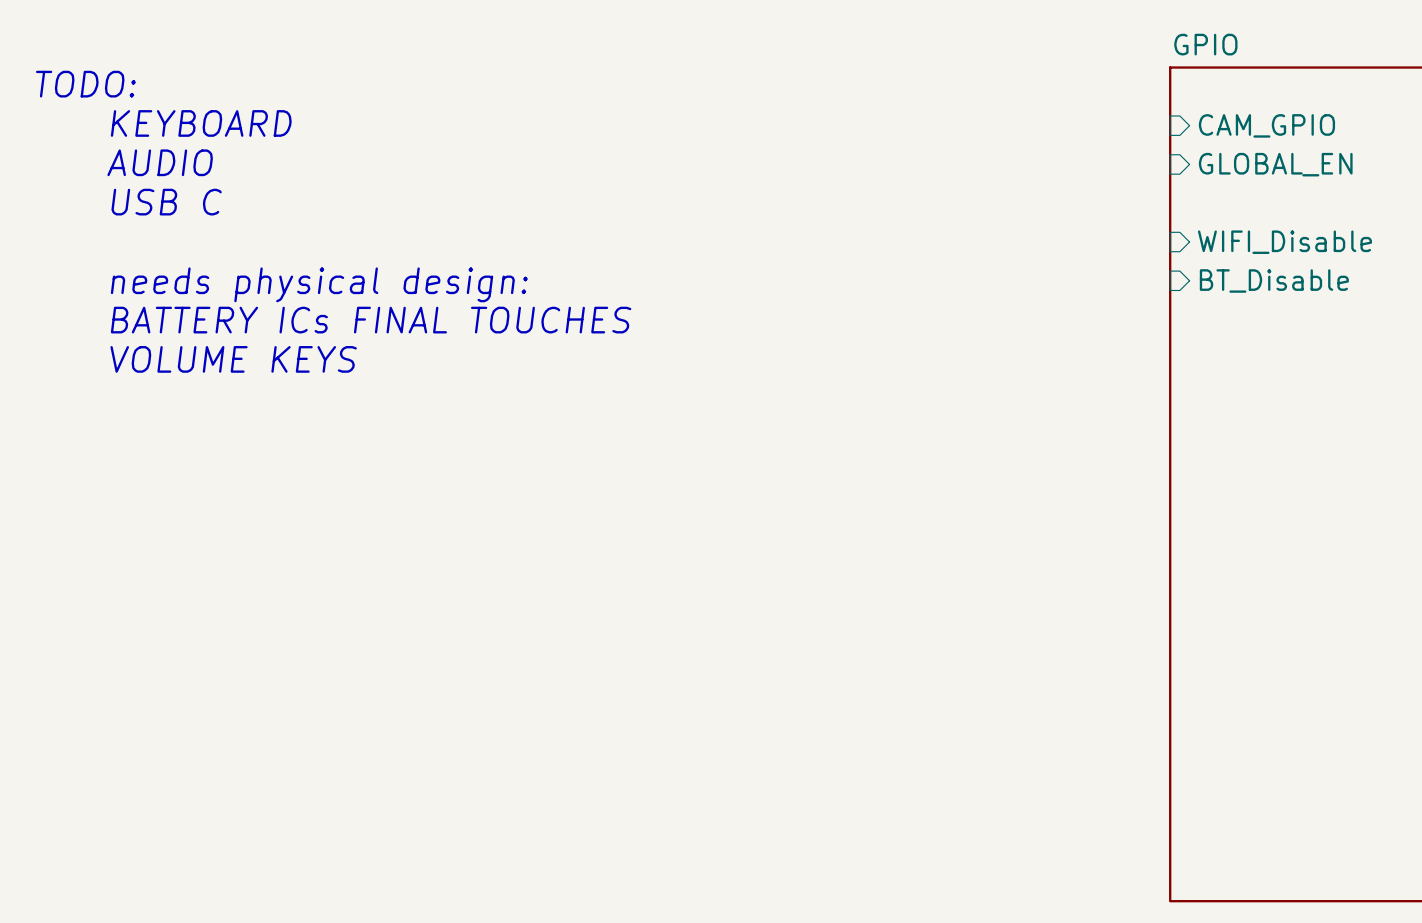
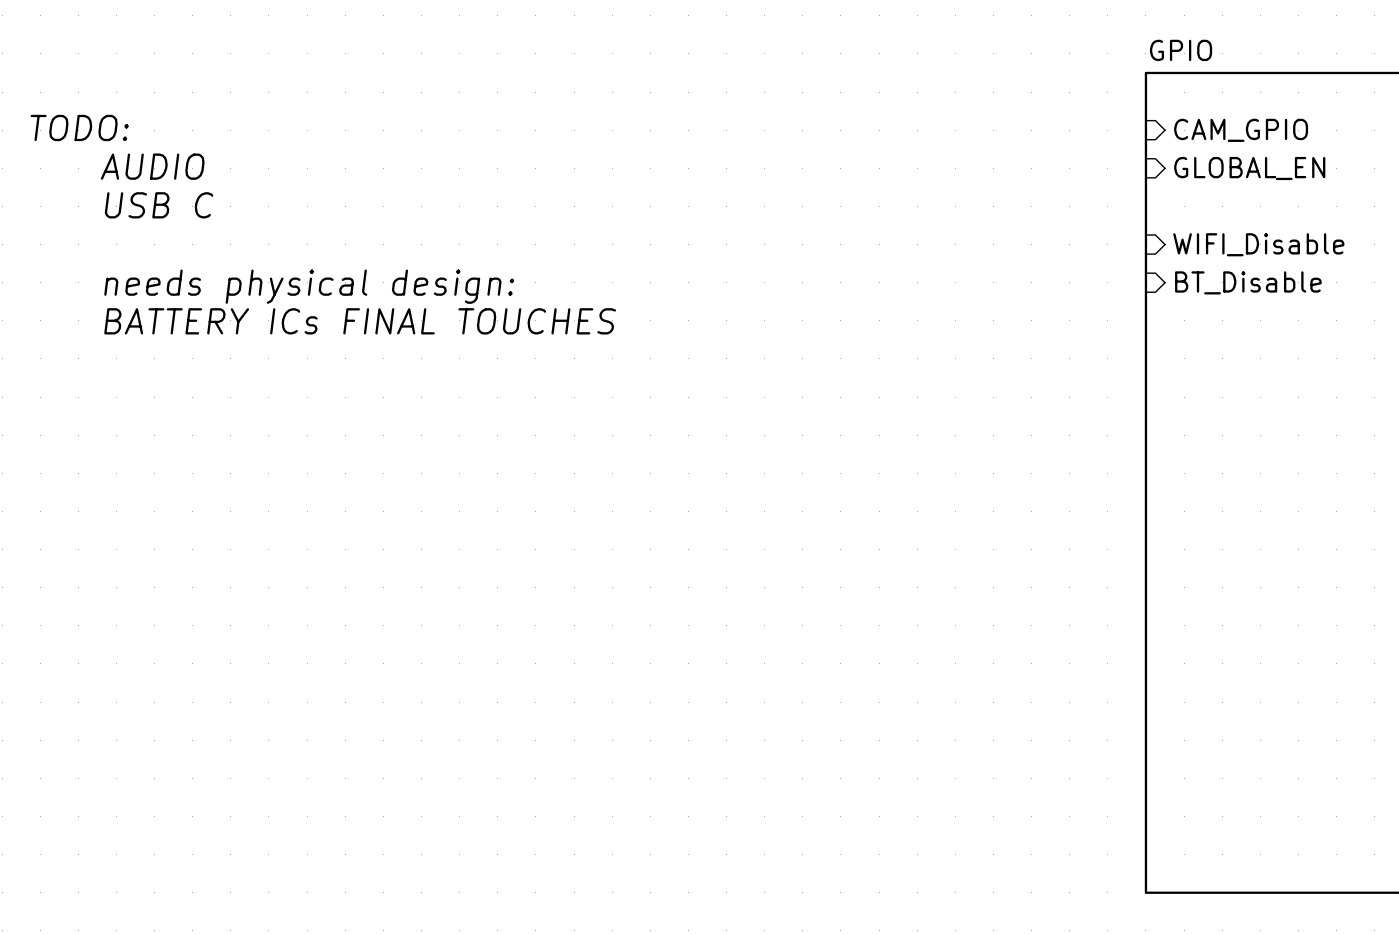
text: TODO: (85, 84) -> none
text: KEYBOARD (201, 123) -> TODO: (79, 127)
text: VOLUME KEYS (233, 359) -> none

